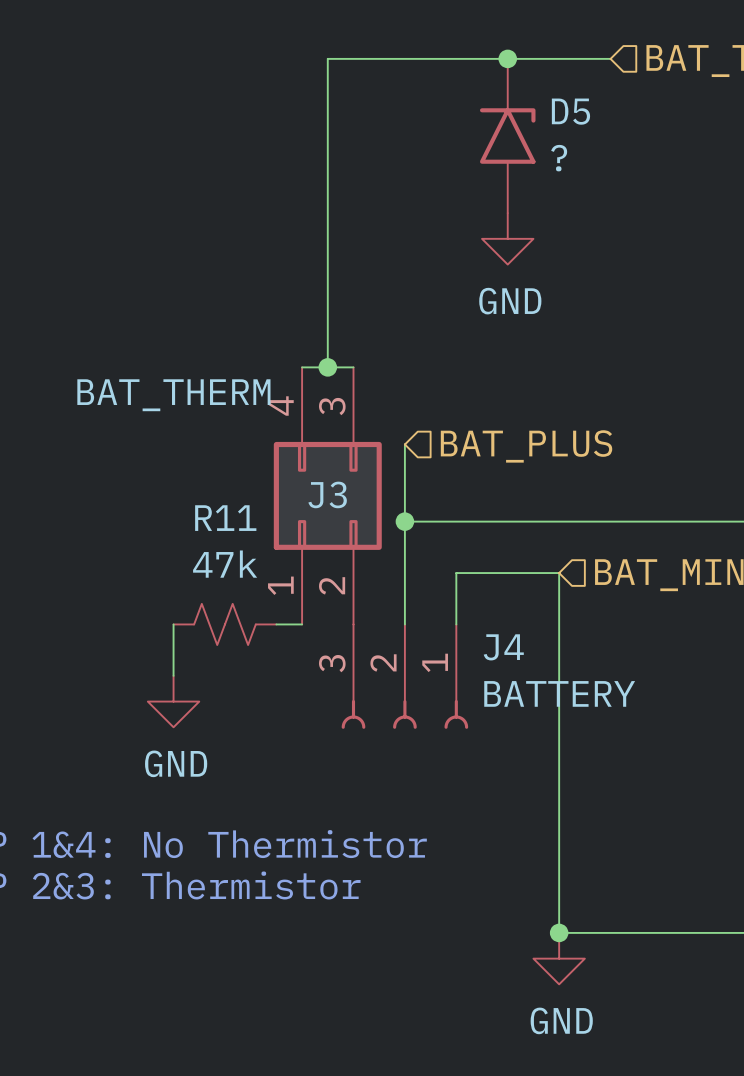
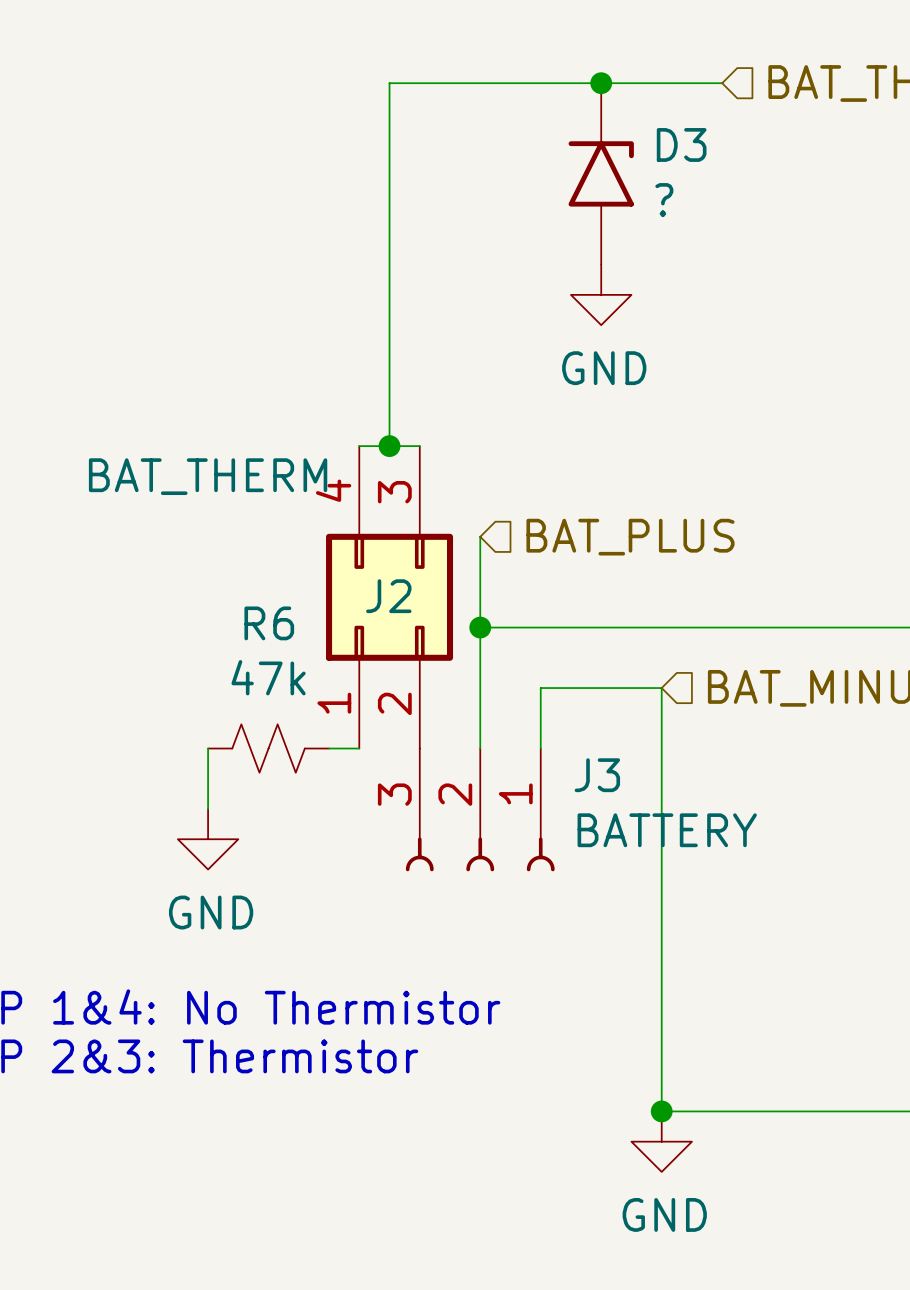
D5 name: D5 (570, 111) -> D3 (681, 144)
J3 name: J3 (327, 494) -> J2 (388, 596)
R11 name: R11 (225, 518) -> R6 (269, 623)
J4 name: J4 (503, 647) -> J3 (597, 775)

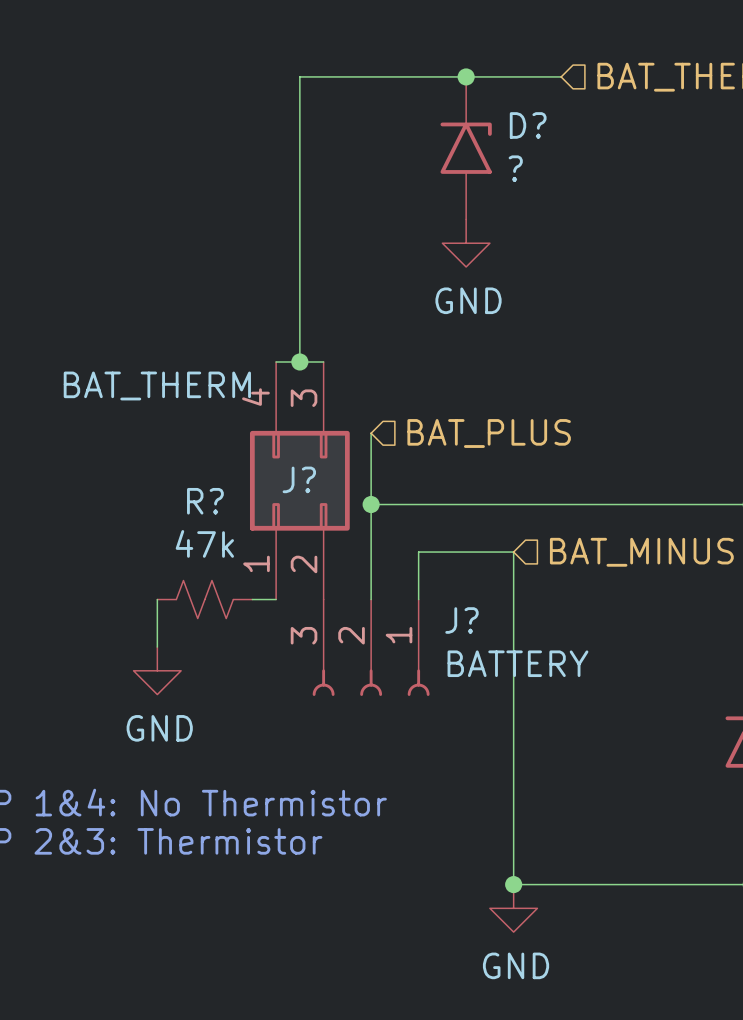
D3 name: D3 (681, 144) -> D? (528, 125)
J2 name: J2 (388, 596) -> J? (299, 479)
R6 name: R6 (269, 623) -> R? (205, 501)
J3 name: J3 (597, 775) -> J? (461, 620)

